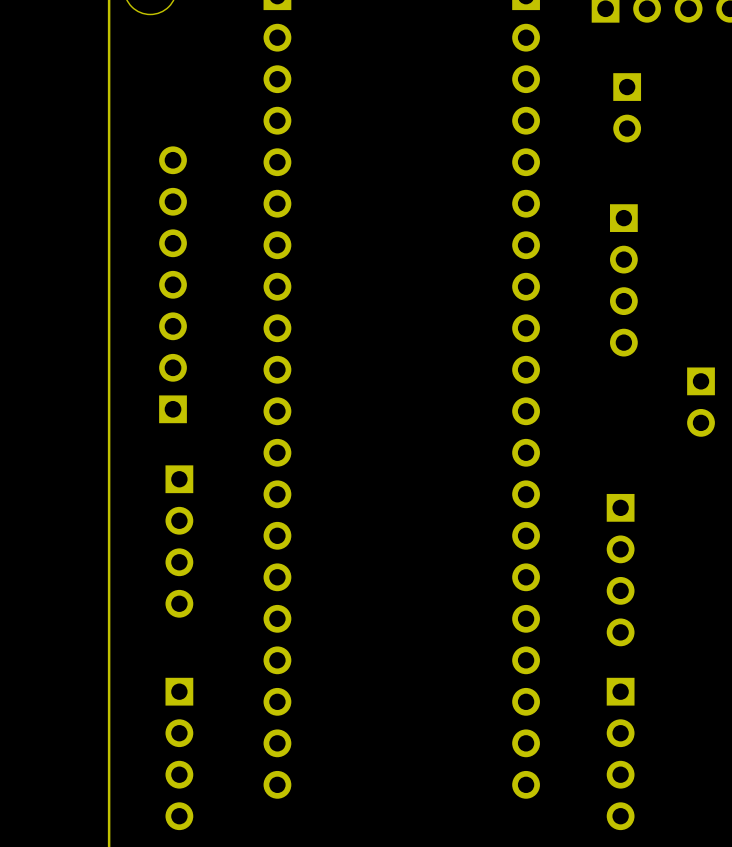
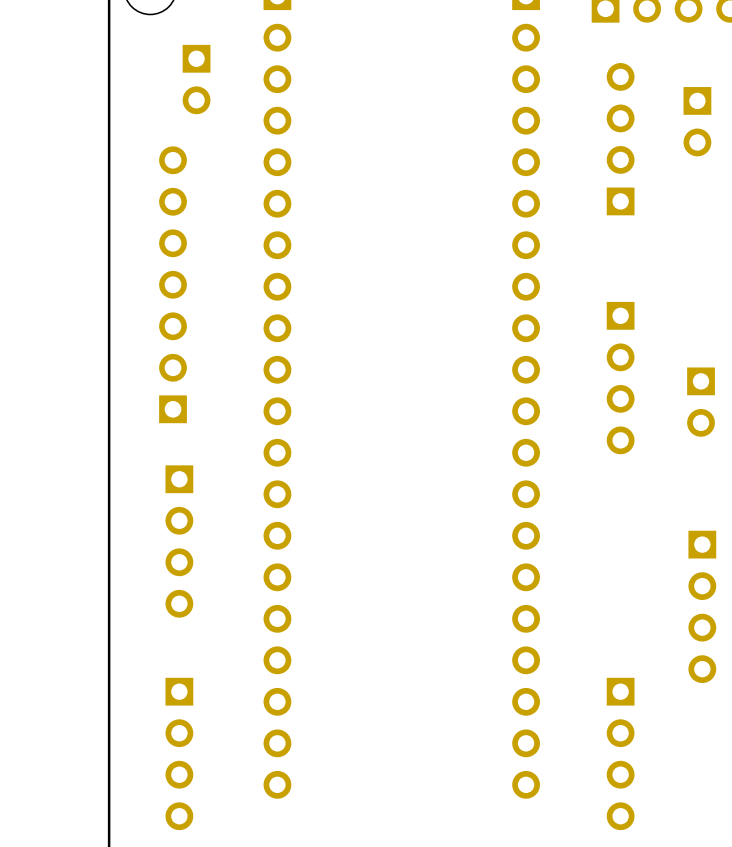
part: none -> (196, 79)
part position: (627, 107) -> (697, 121)
part: none -> (620, 139)
part: (623, 280) -> none
part: none -> (620, 378)
part position: (620, 570) -> (702, 606)

